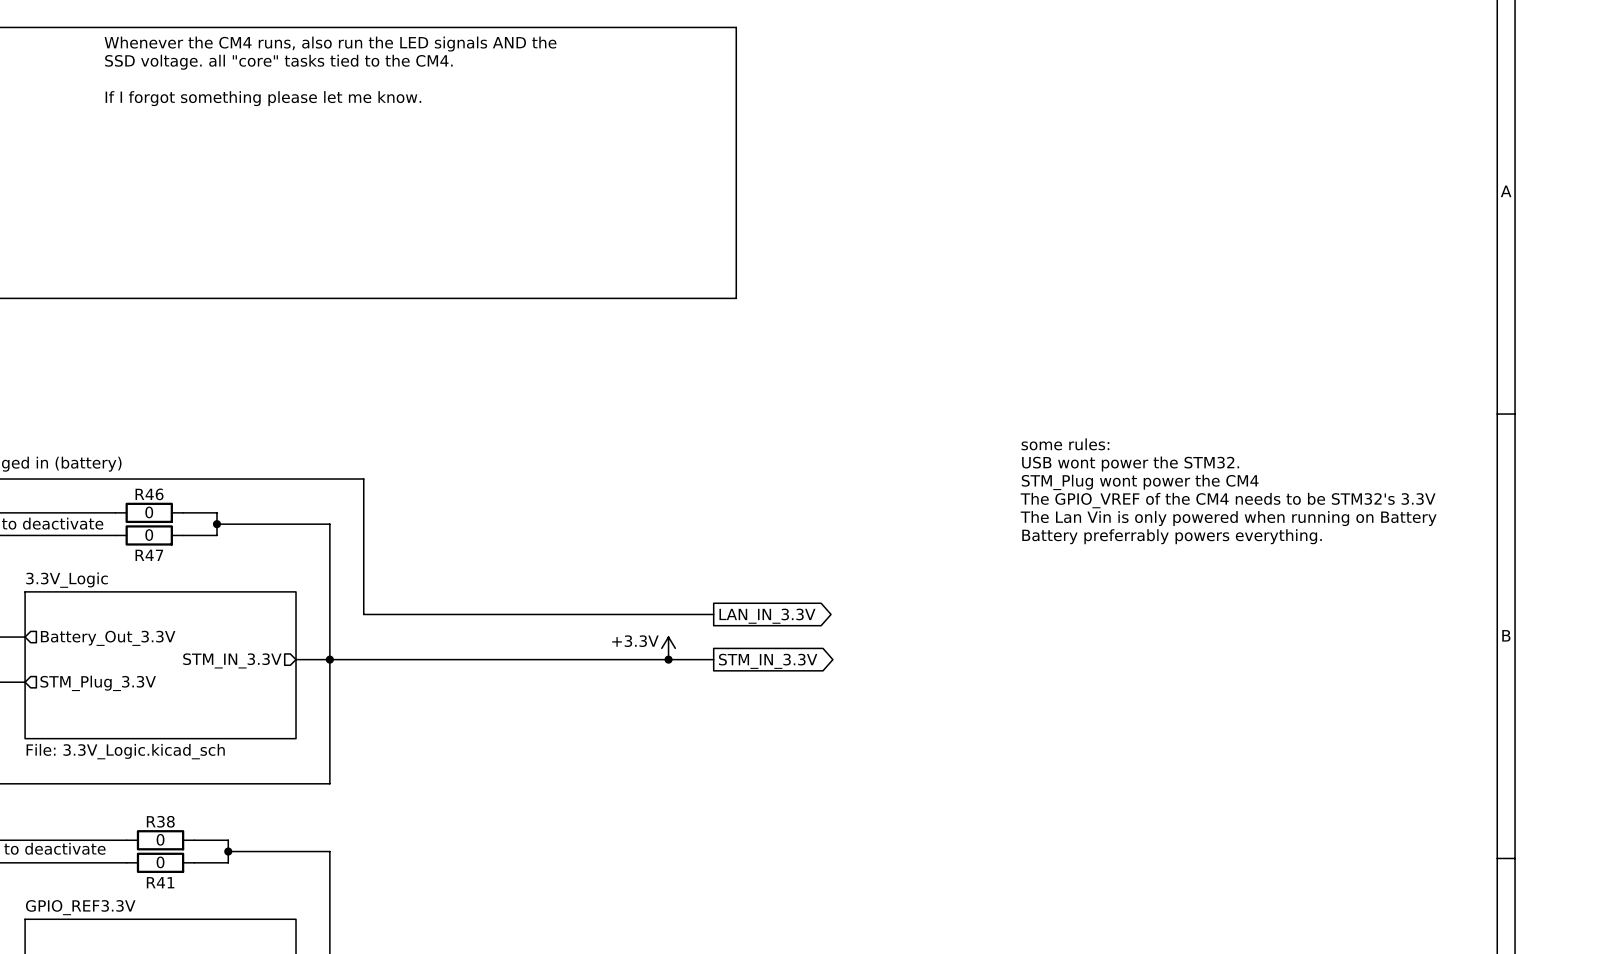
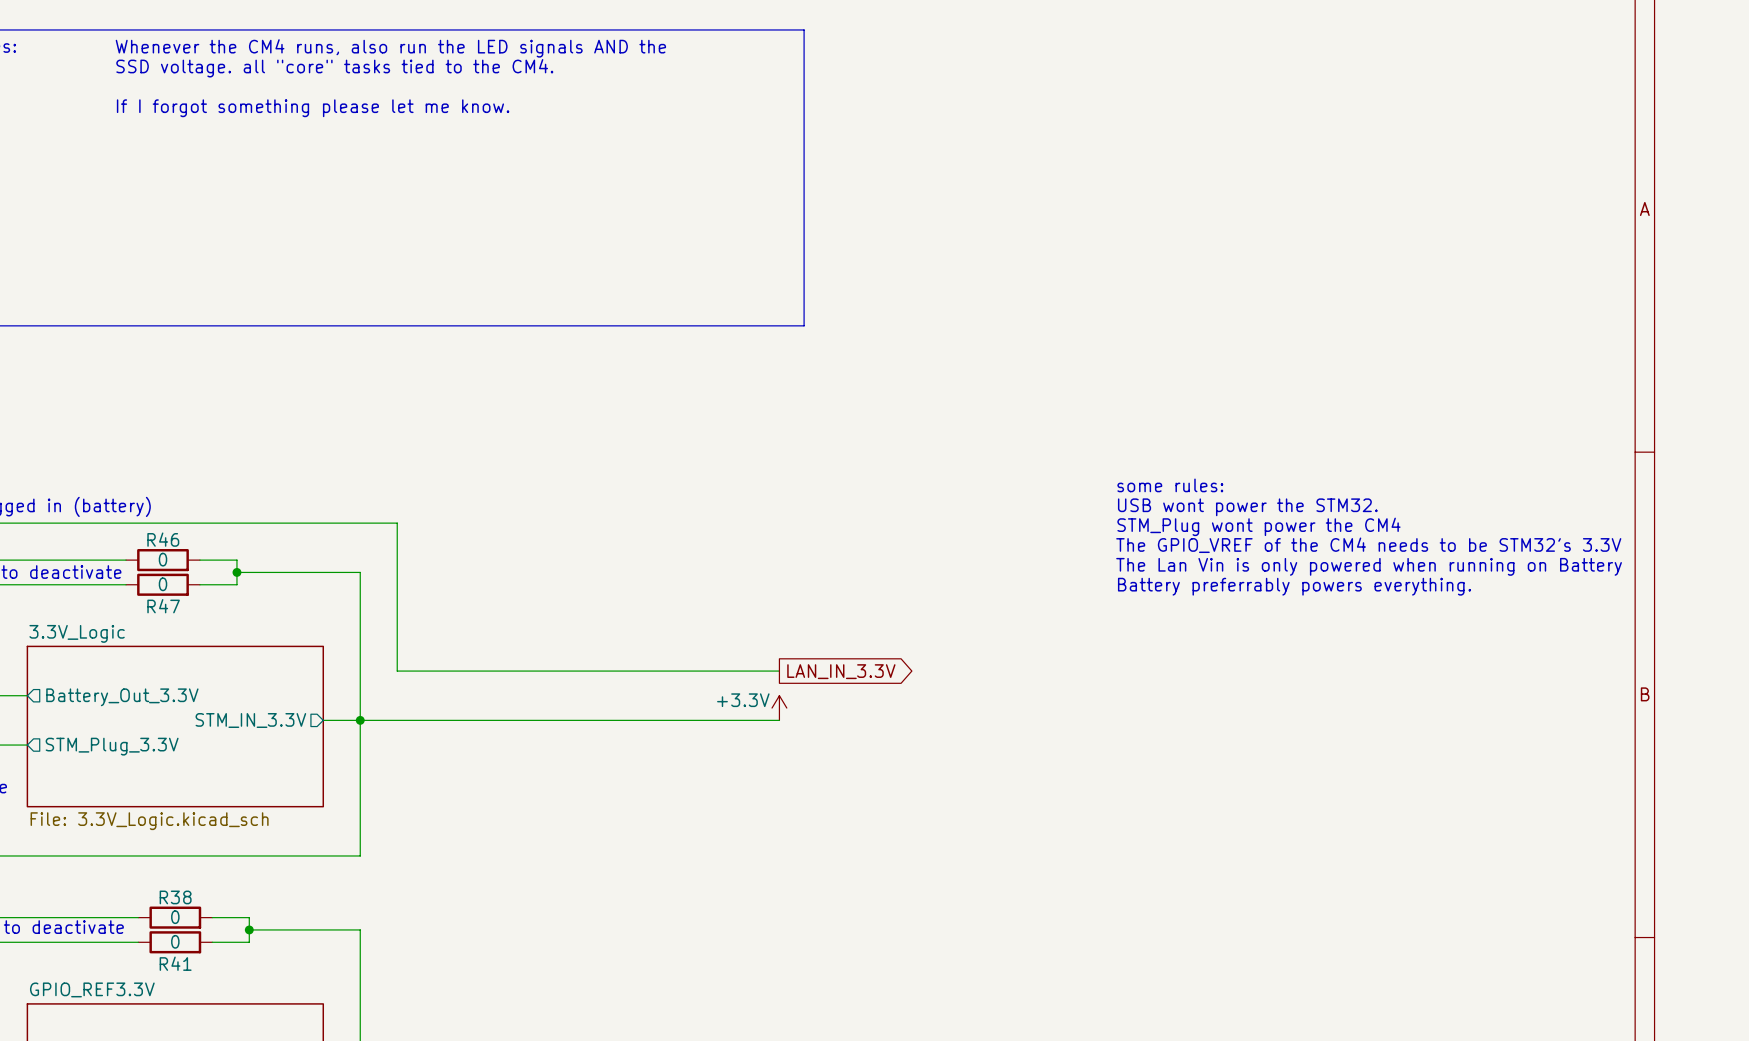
power symbol position: +3.3V (668, 648) -> +3.3V (779, 708)
junction: (668, 659) -> none
global label: STM_IN_3.3V (768, 661) -> none

